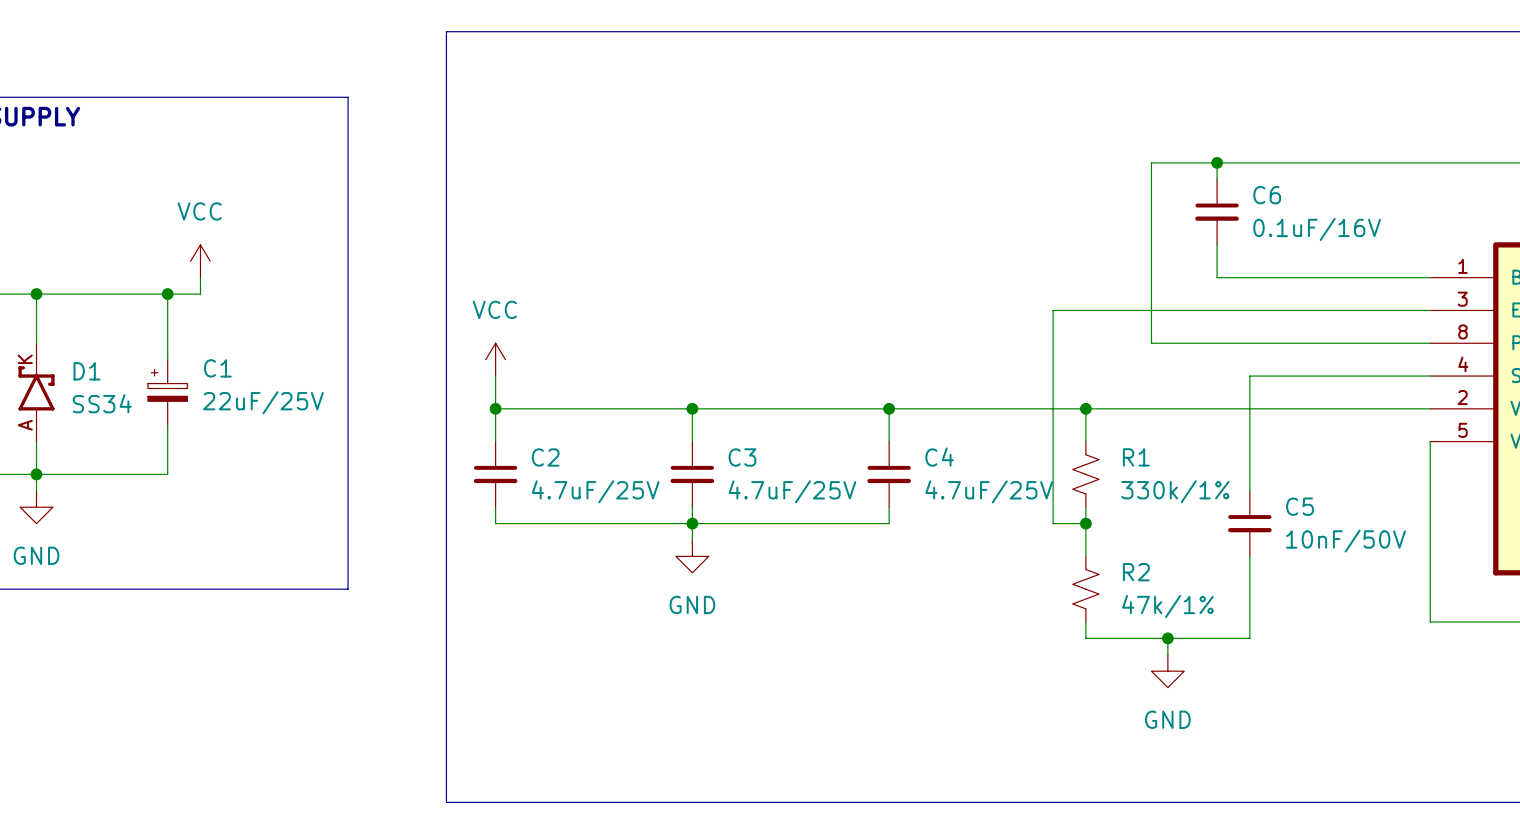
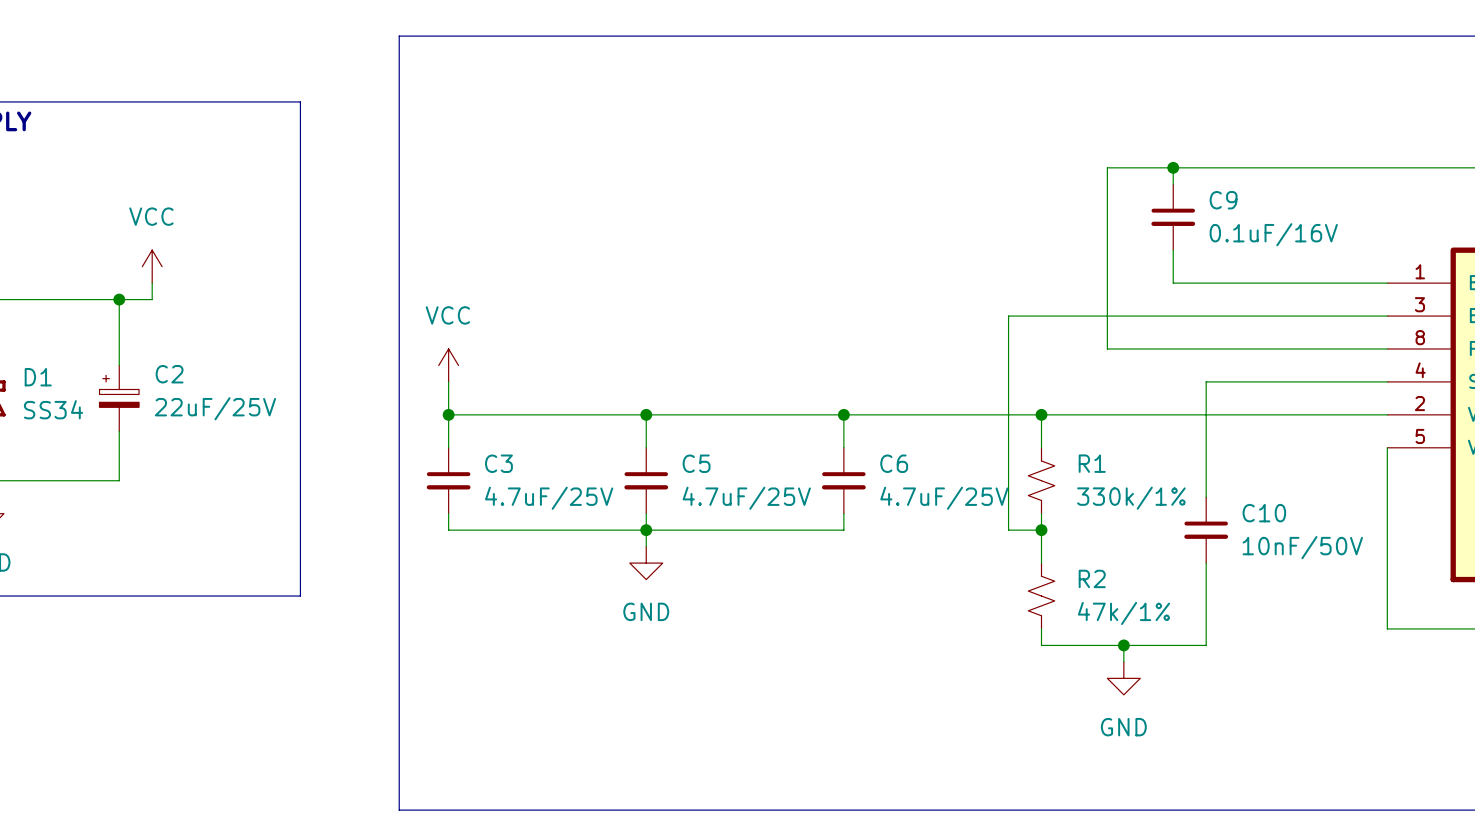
C6 name: C6 (1267, 195) -> C9 (1223, 200)
C1 name: C1 (217, 368) -> C2 (169, 374)
C2 name: C2 (545, 457) -> C3 (498, 463)
C3 name: C3 (742, 457) -> C5 (696, 463)
C4 name: C4 (939, 457) -> C6 (894, 463)
C5 name: C5 (1299, 506) -> C10 (1264, 513)

